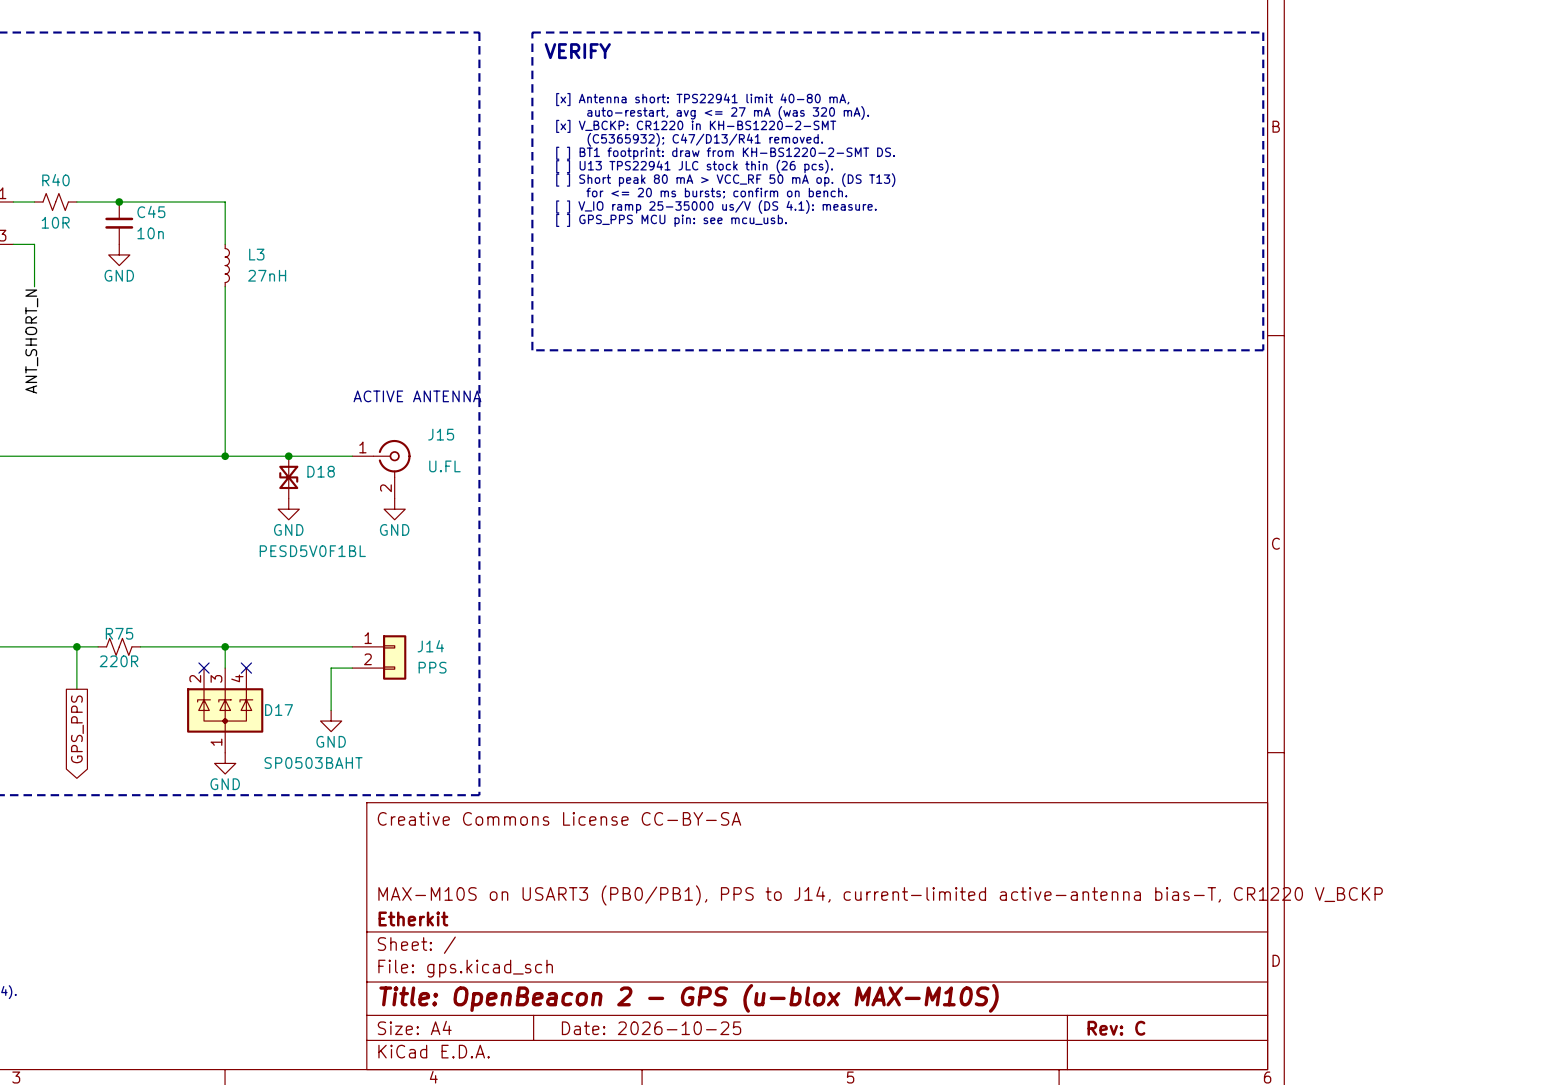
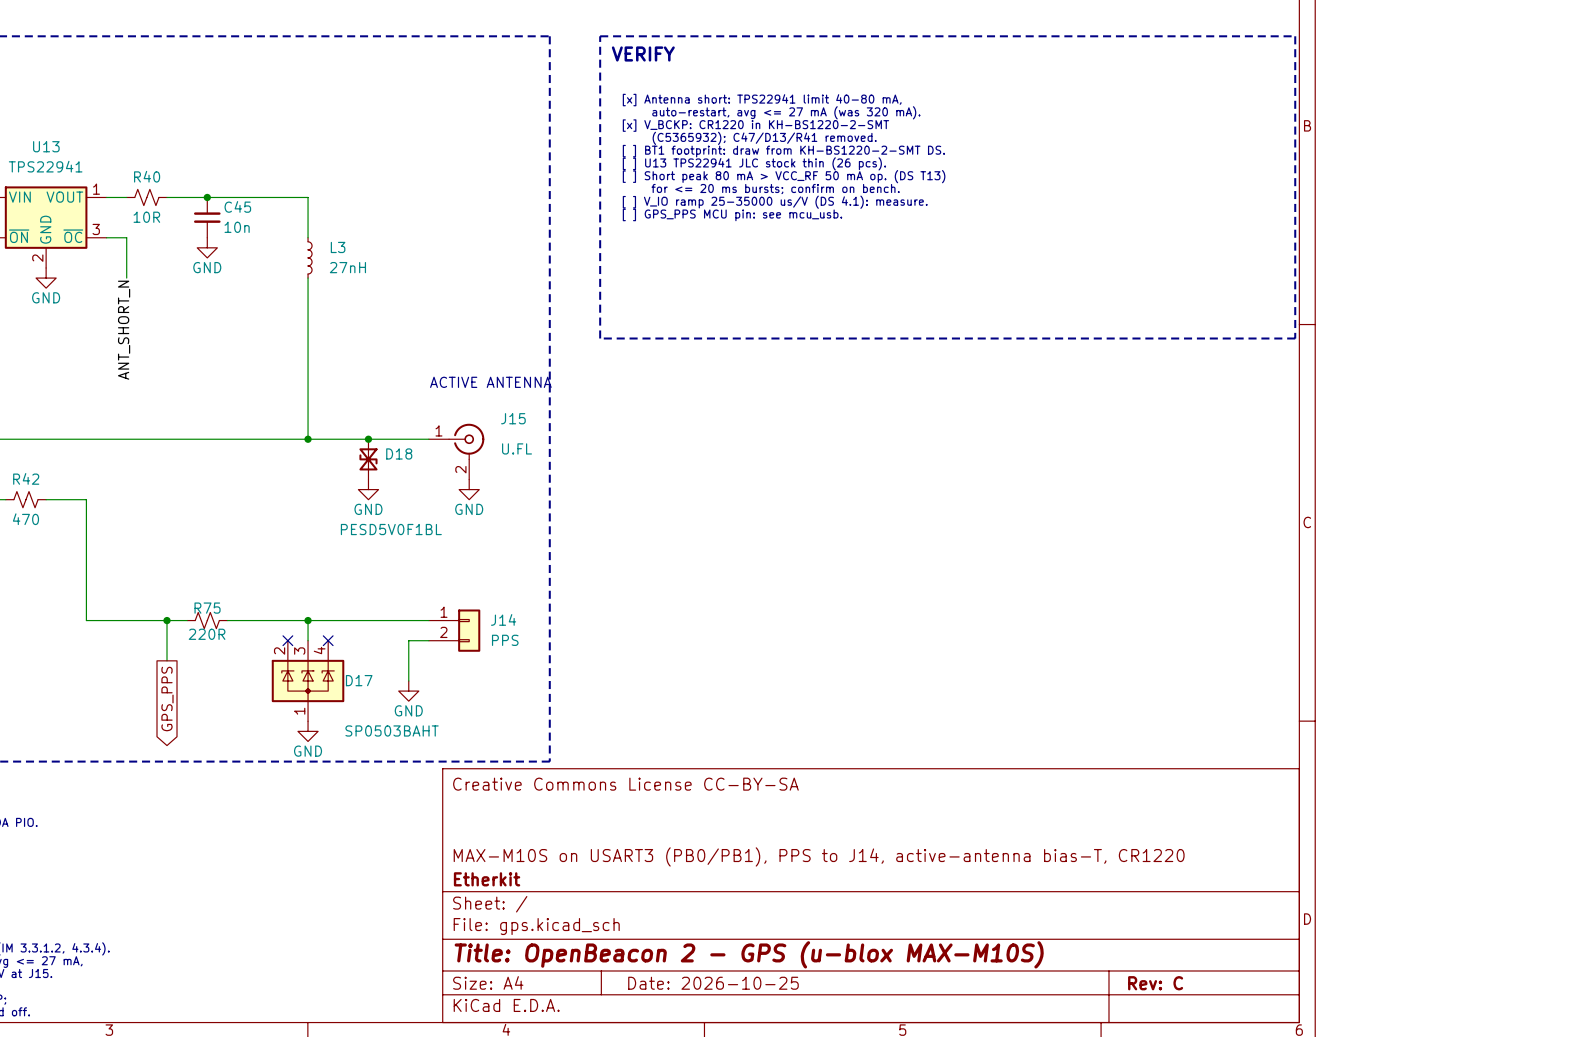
title block: MAX-M10S on USART3 (PB0/PB1), PPS to J14, current-limited active-antenna bias-T, CR1220 V_BCKP (880, 895) -> MAX-M10S on USART3 (PB0/PB1), PPS to J14, active-antenna bias-T, CR1220 (819, 856)

